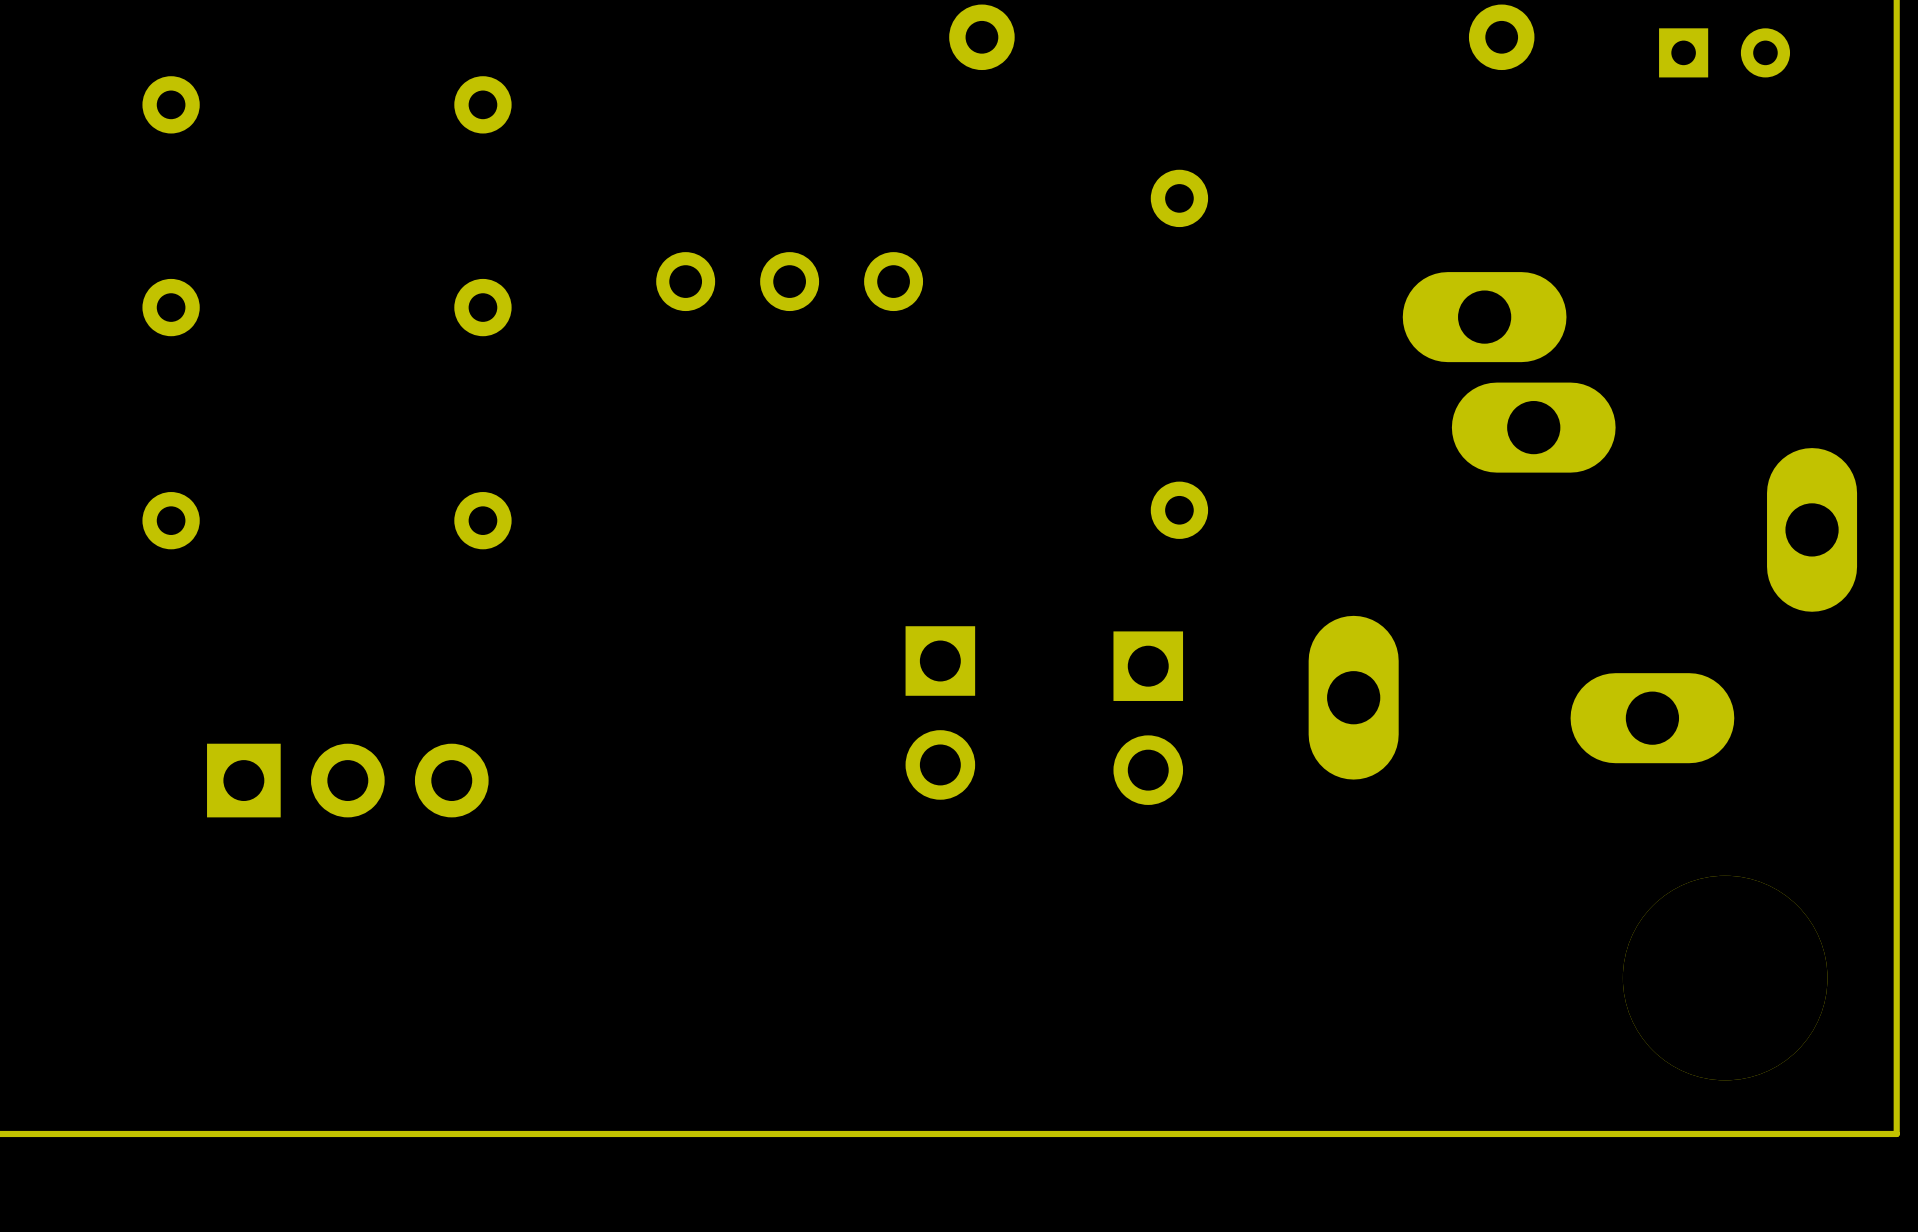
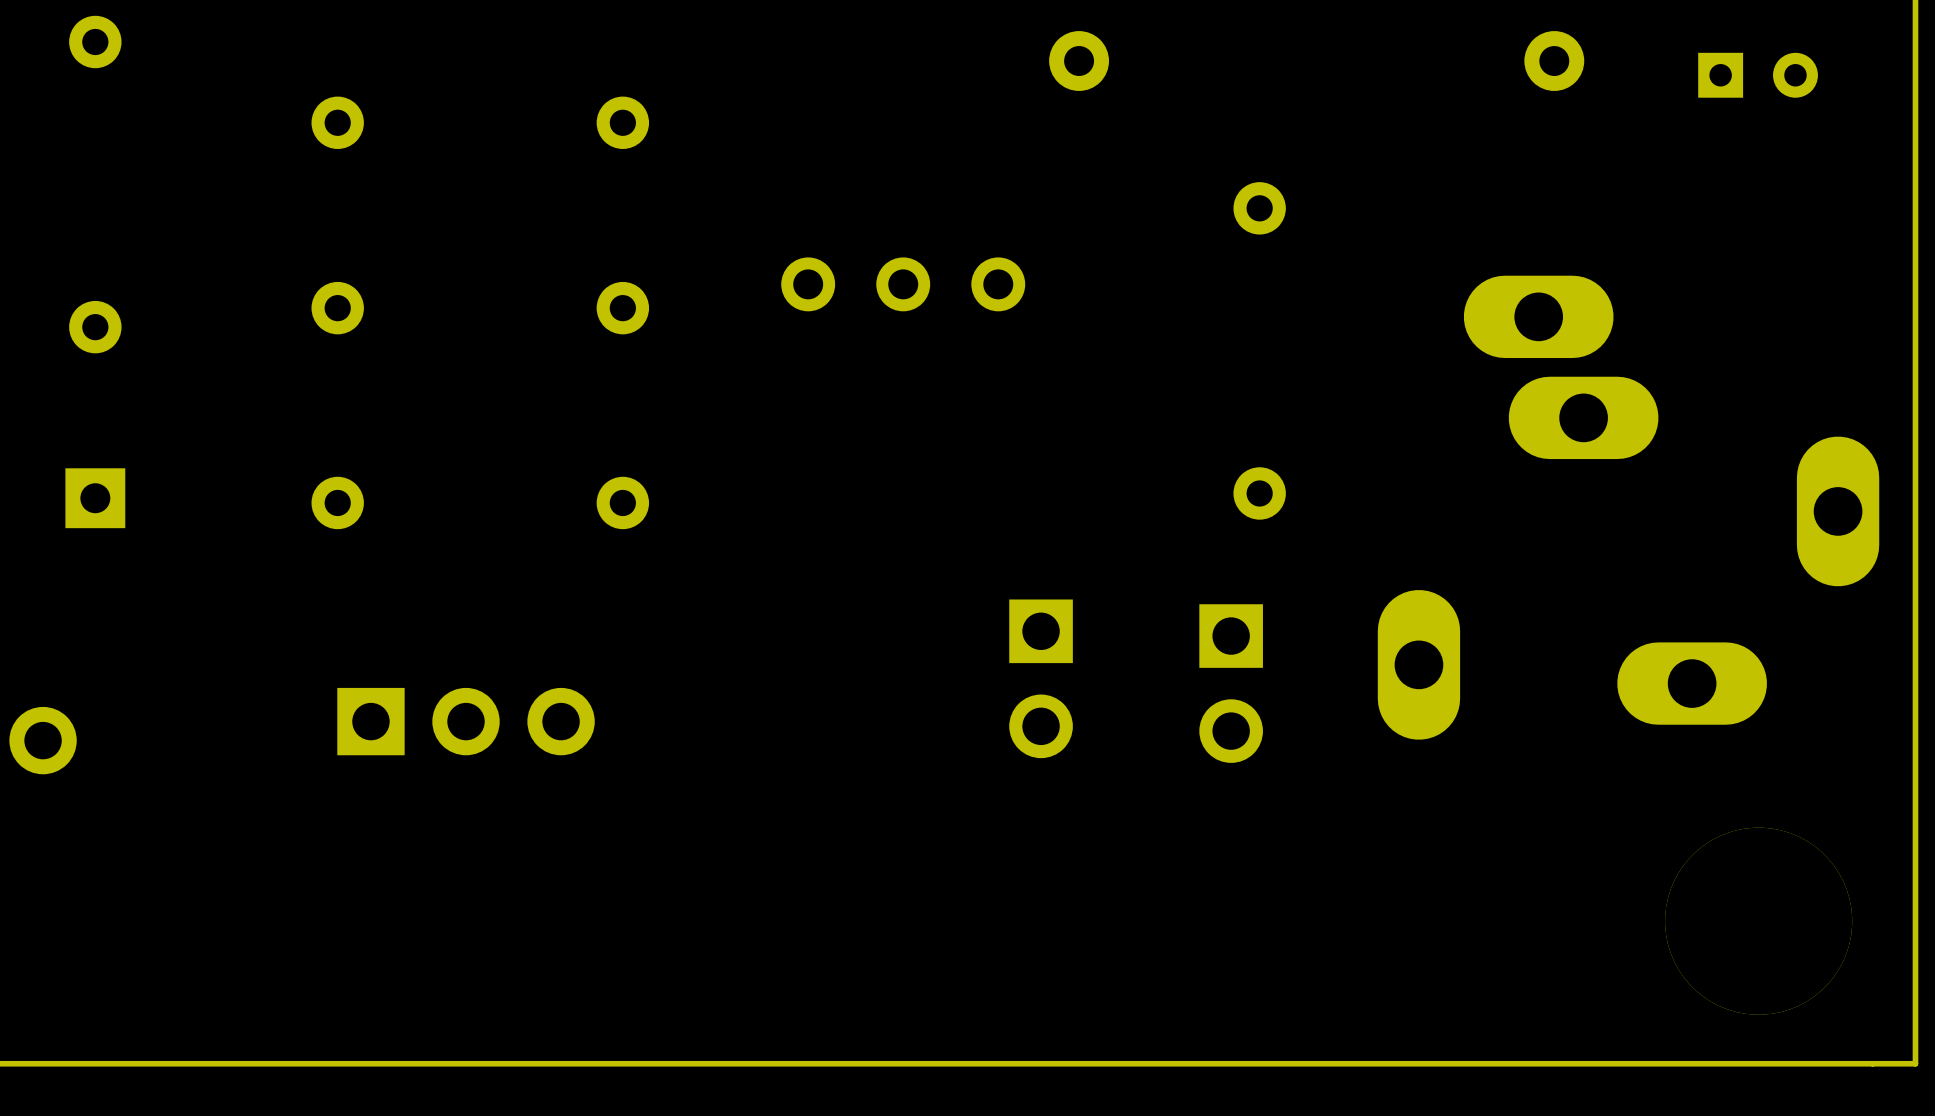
part position: (347, 780) -> (466, 721)

